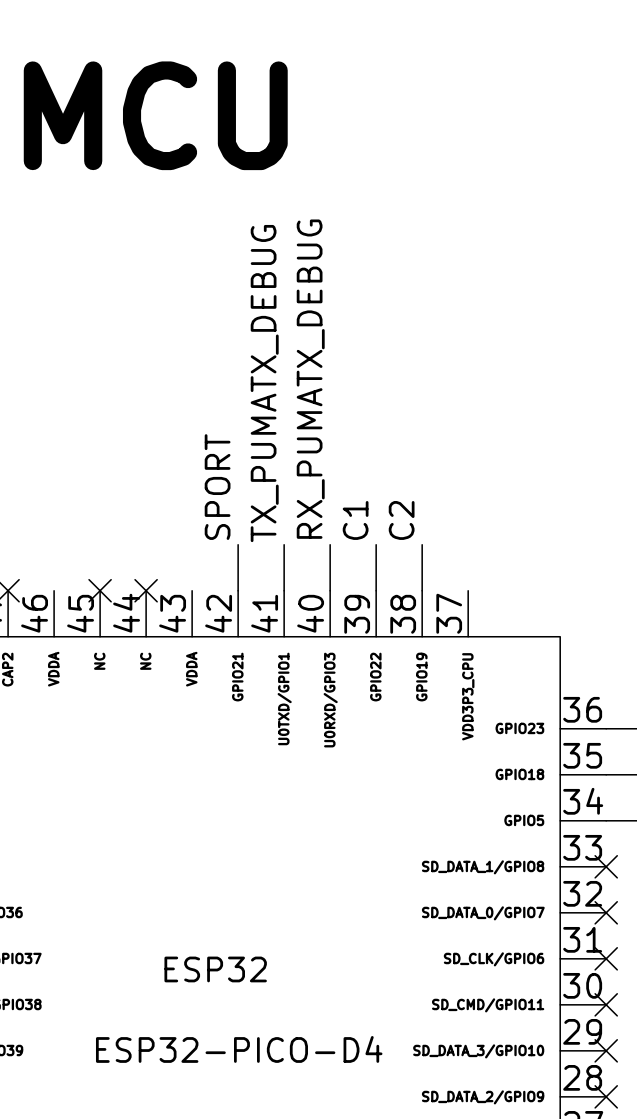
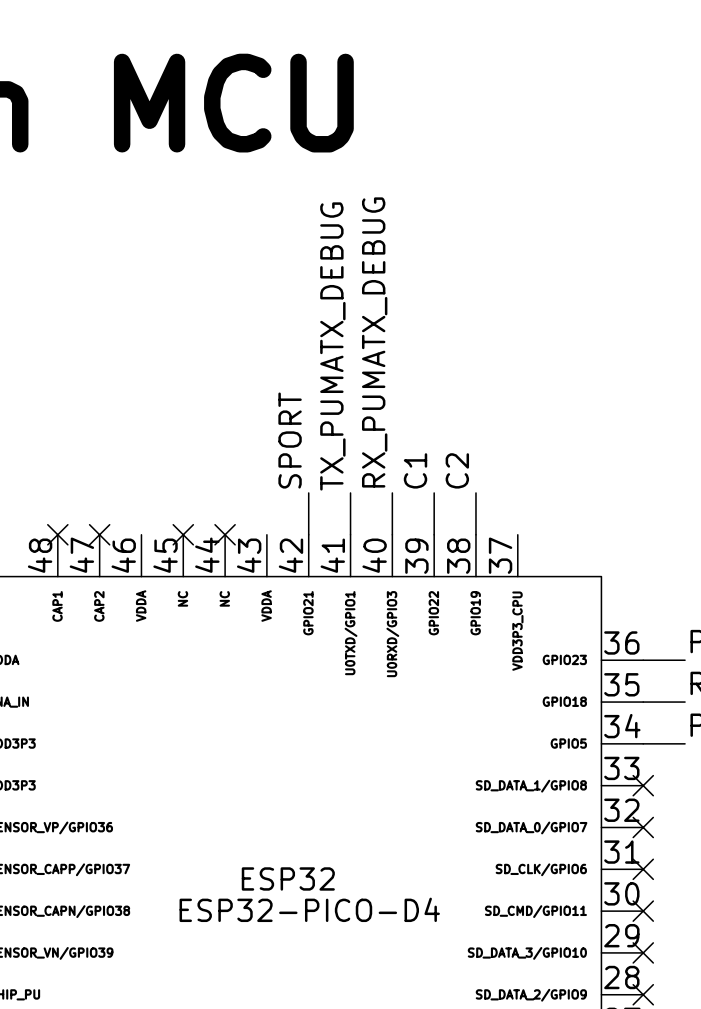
part value position: ESP32-PICO-D4 (239, 1049) -> ESP32-PICO-D4 (309, 909)

